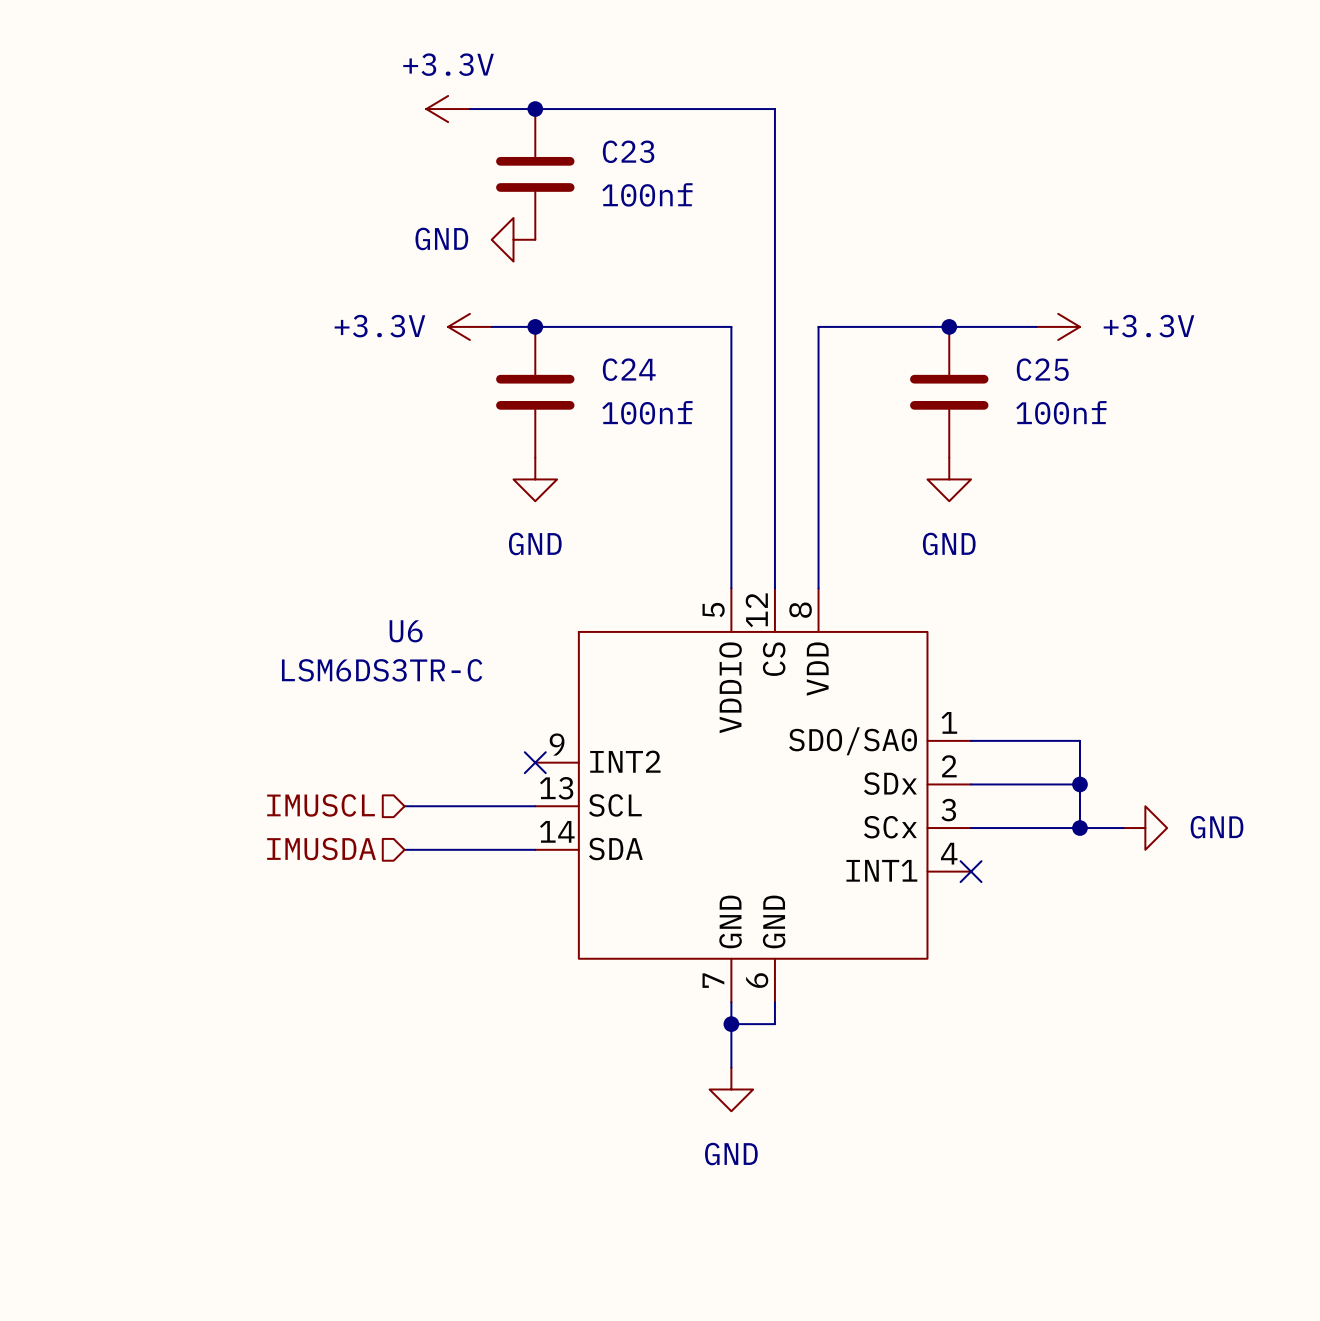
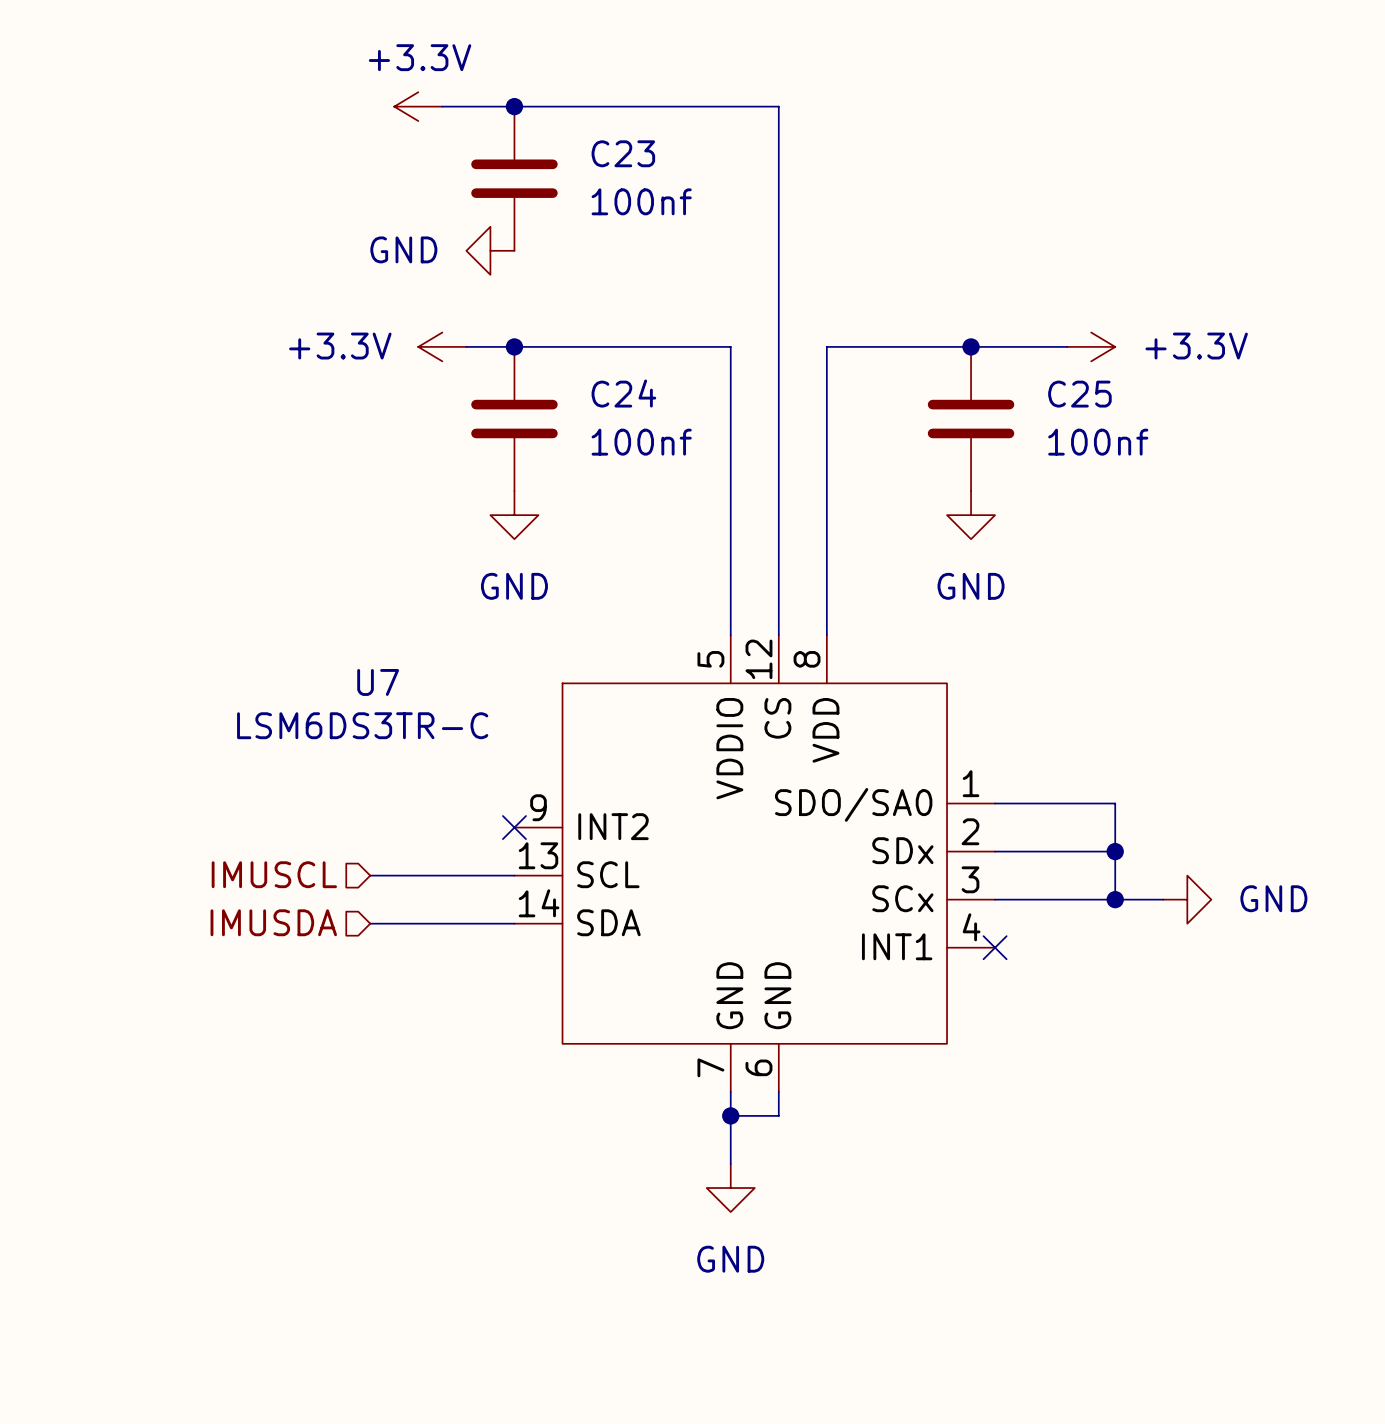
U6 name: U6 (406, 631) -> U7 (378, 682)

